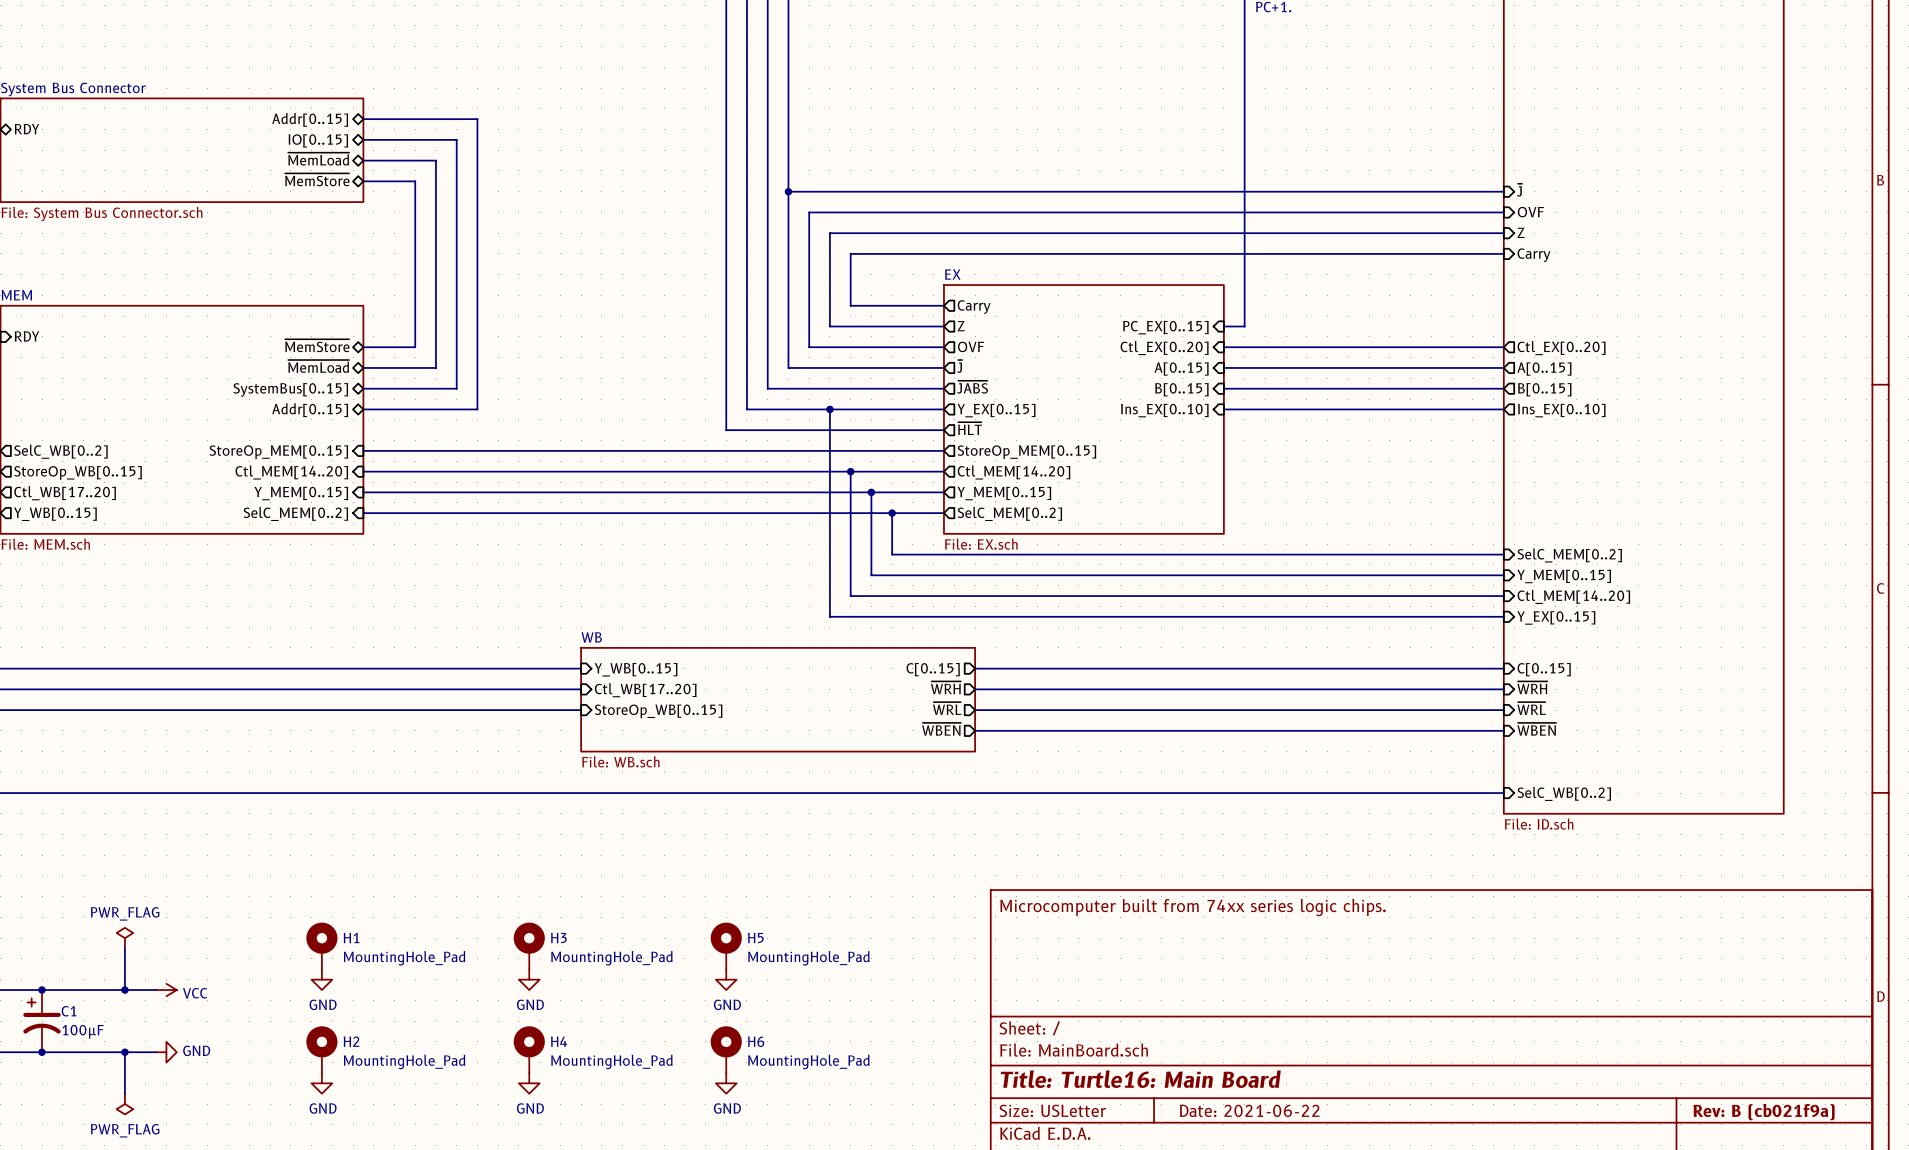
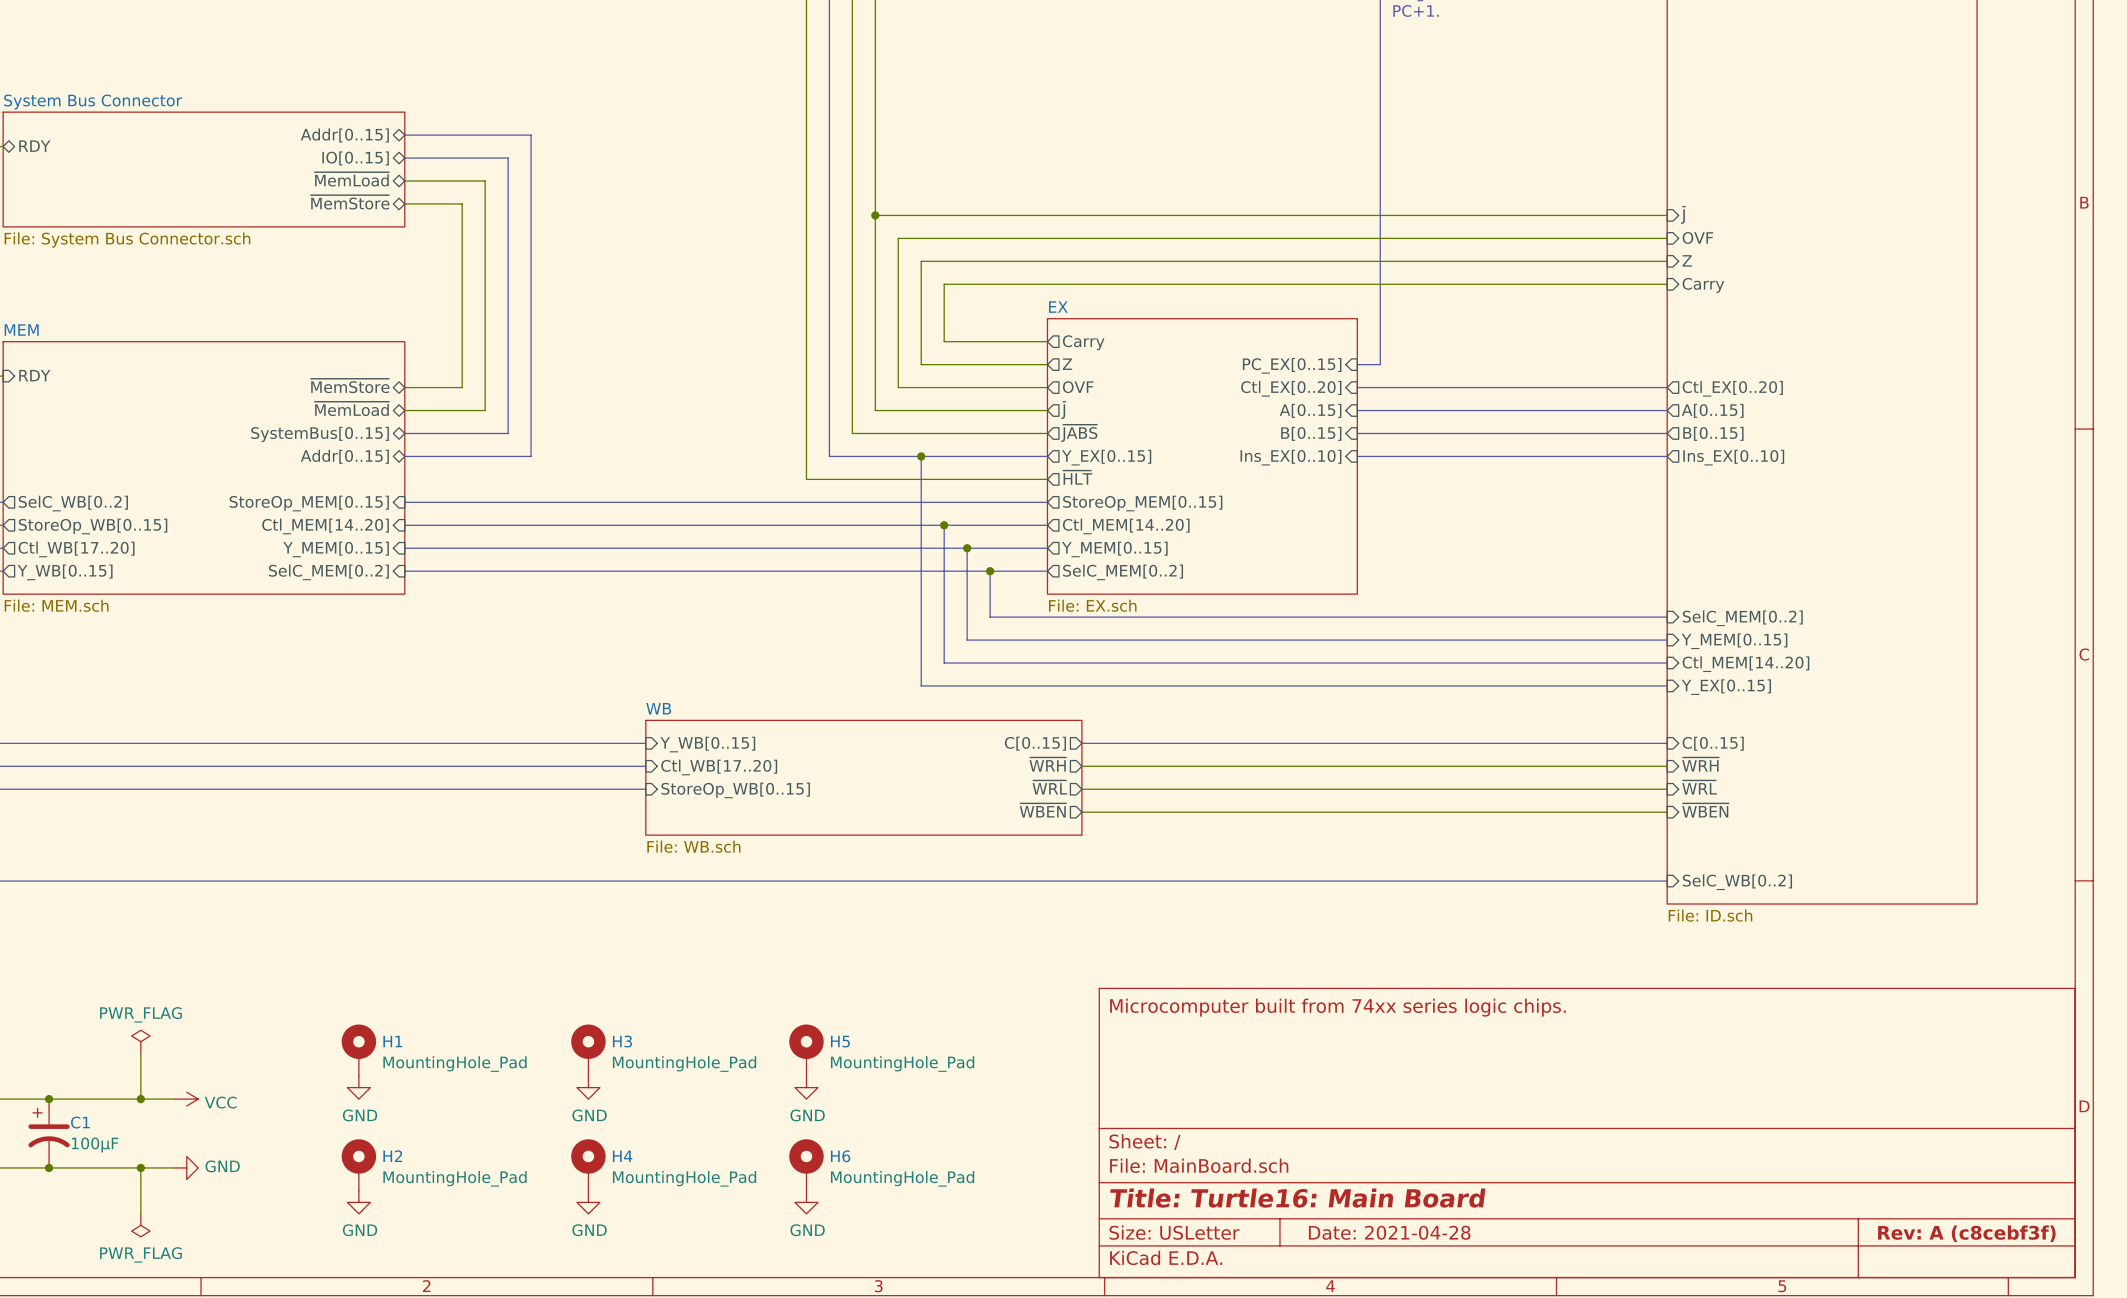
title block: Date: 2021-06-22 (1249, 1110) -> Date: 2021-04-28 (1389, 1232)
title block: Rev: B (cb021f9a) (1764, 1112) -> Rev: A (c8cebf3f) (1966, 1233)

